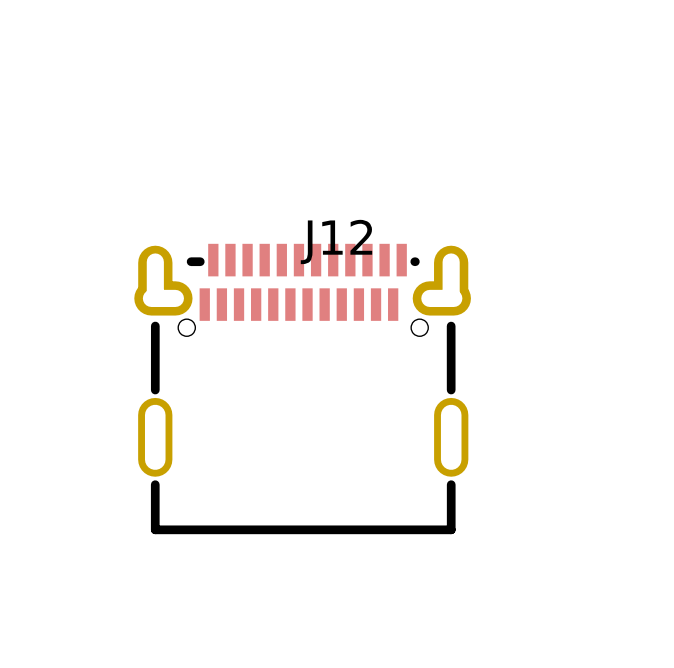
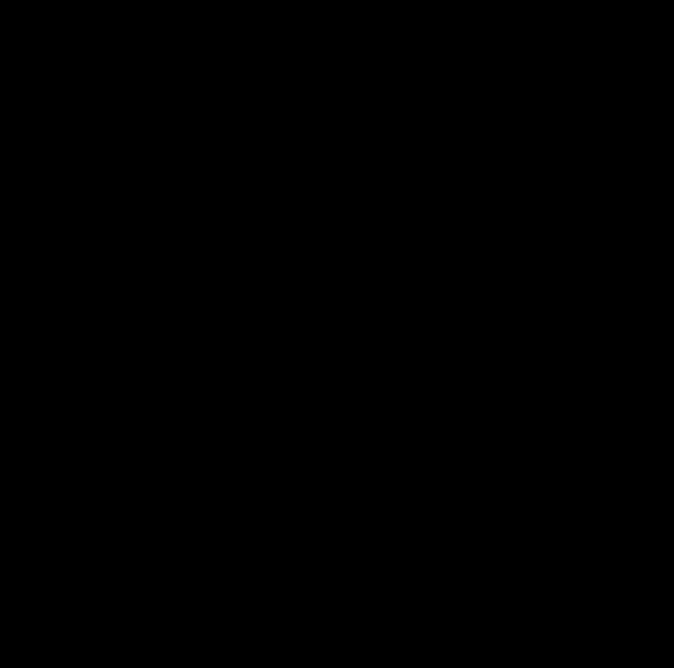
J12: (302, 389) -> none

